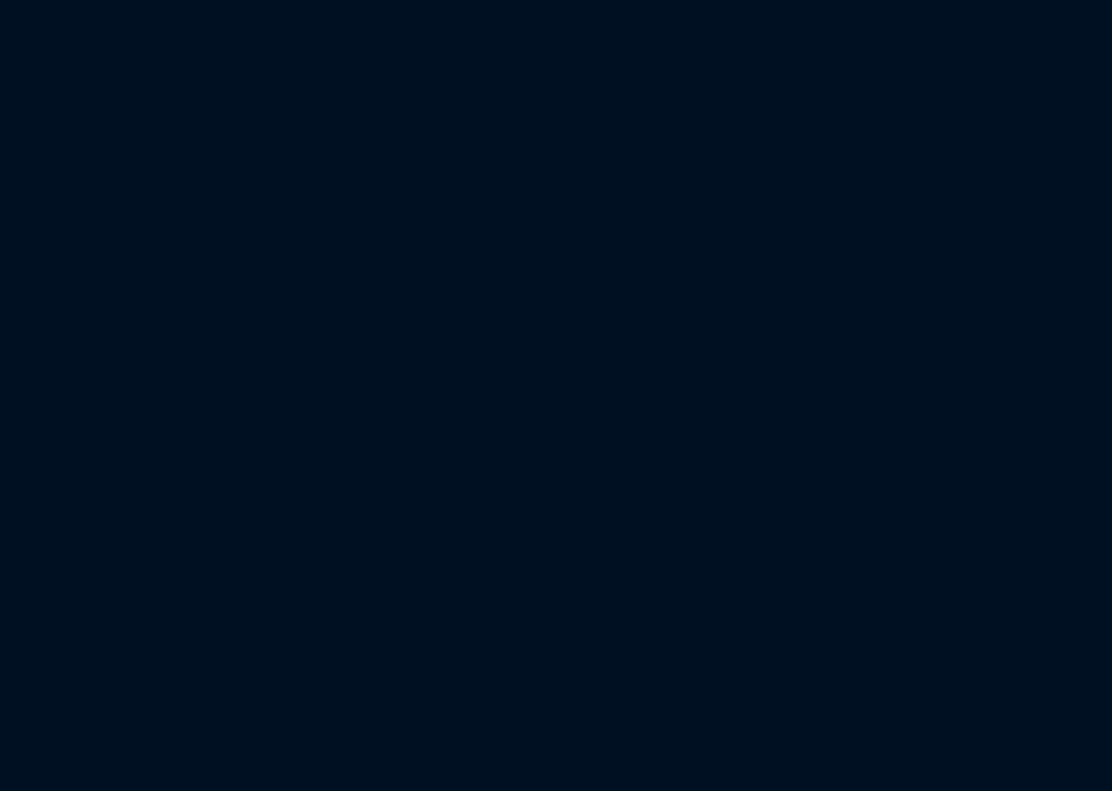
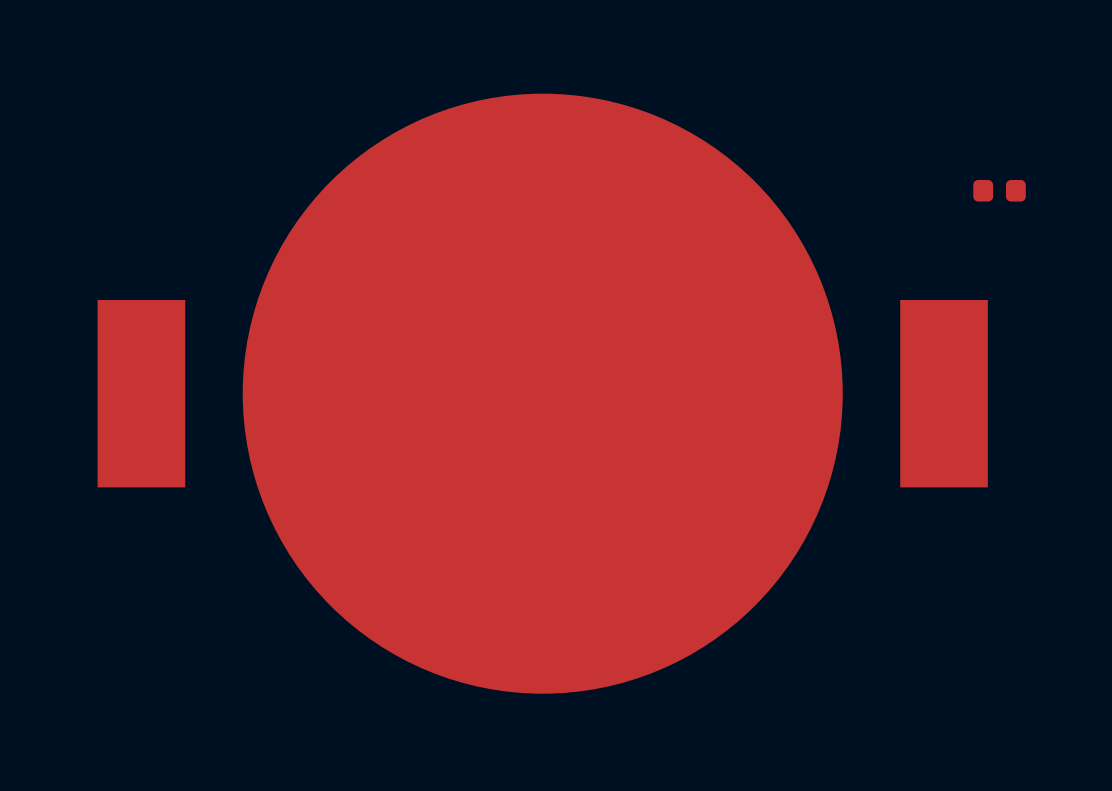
part: none -> (999, 190)
part: none -> (542, 393)

